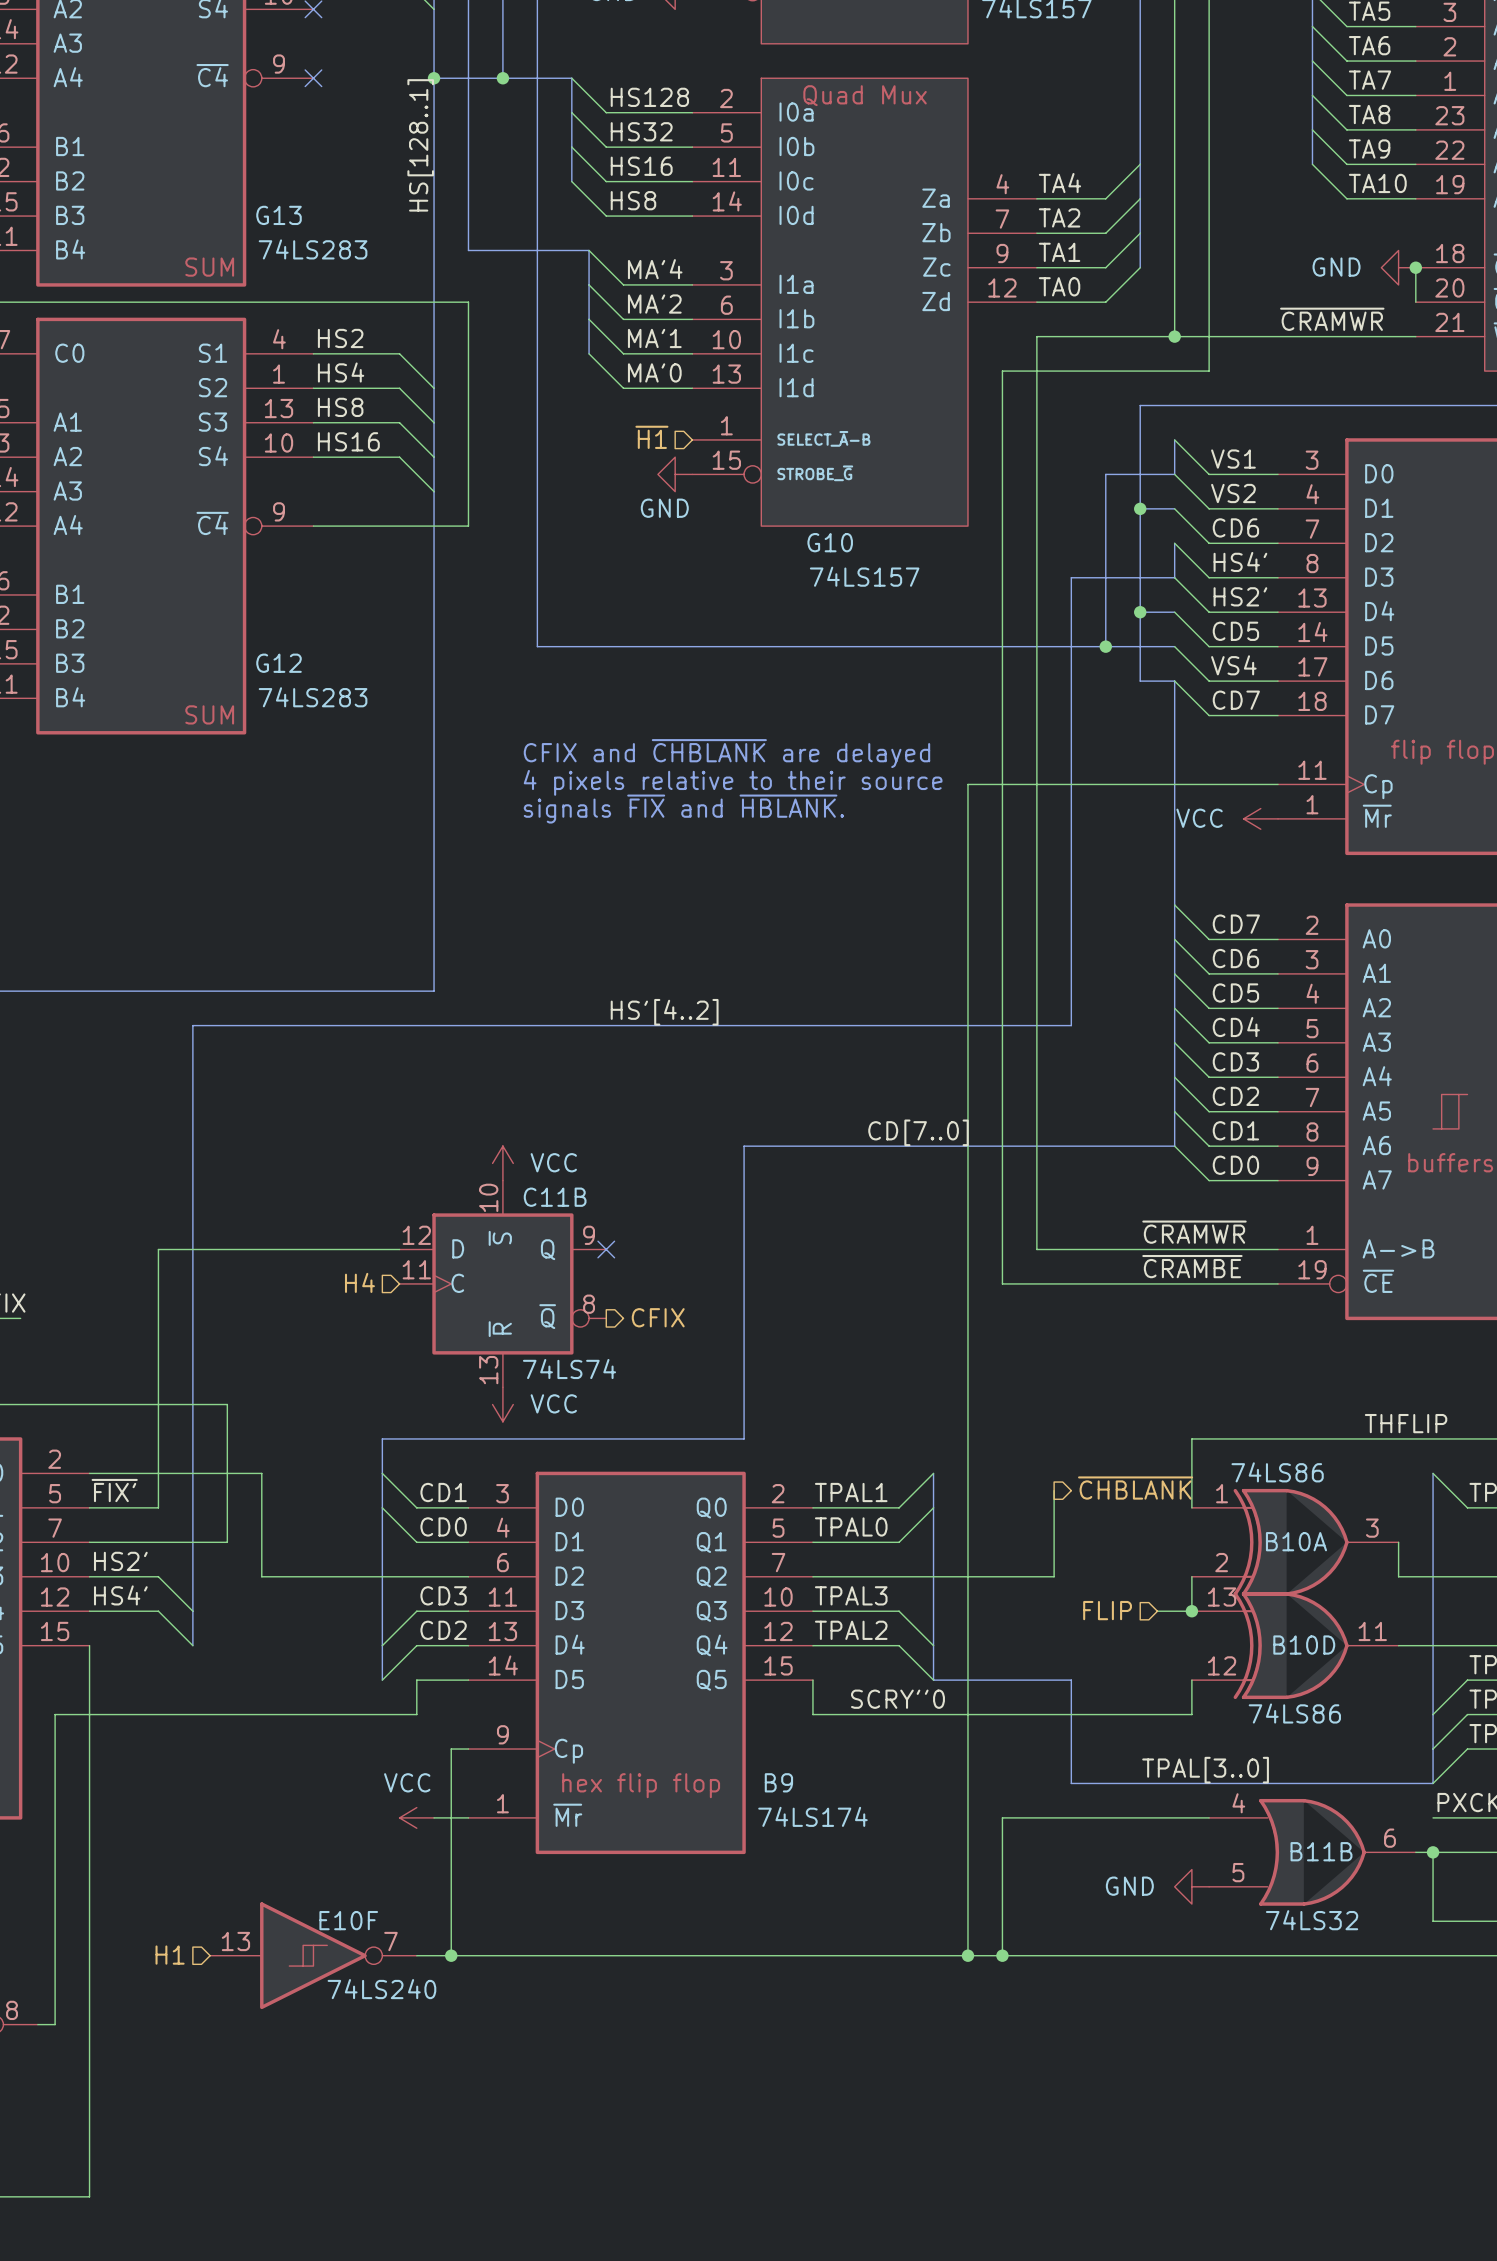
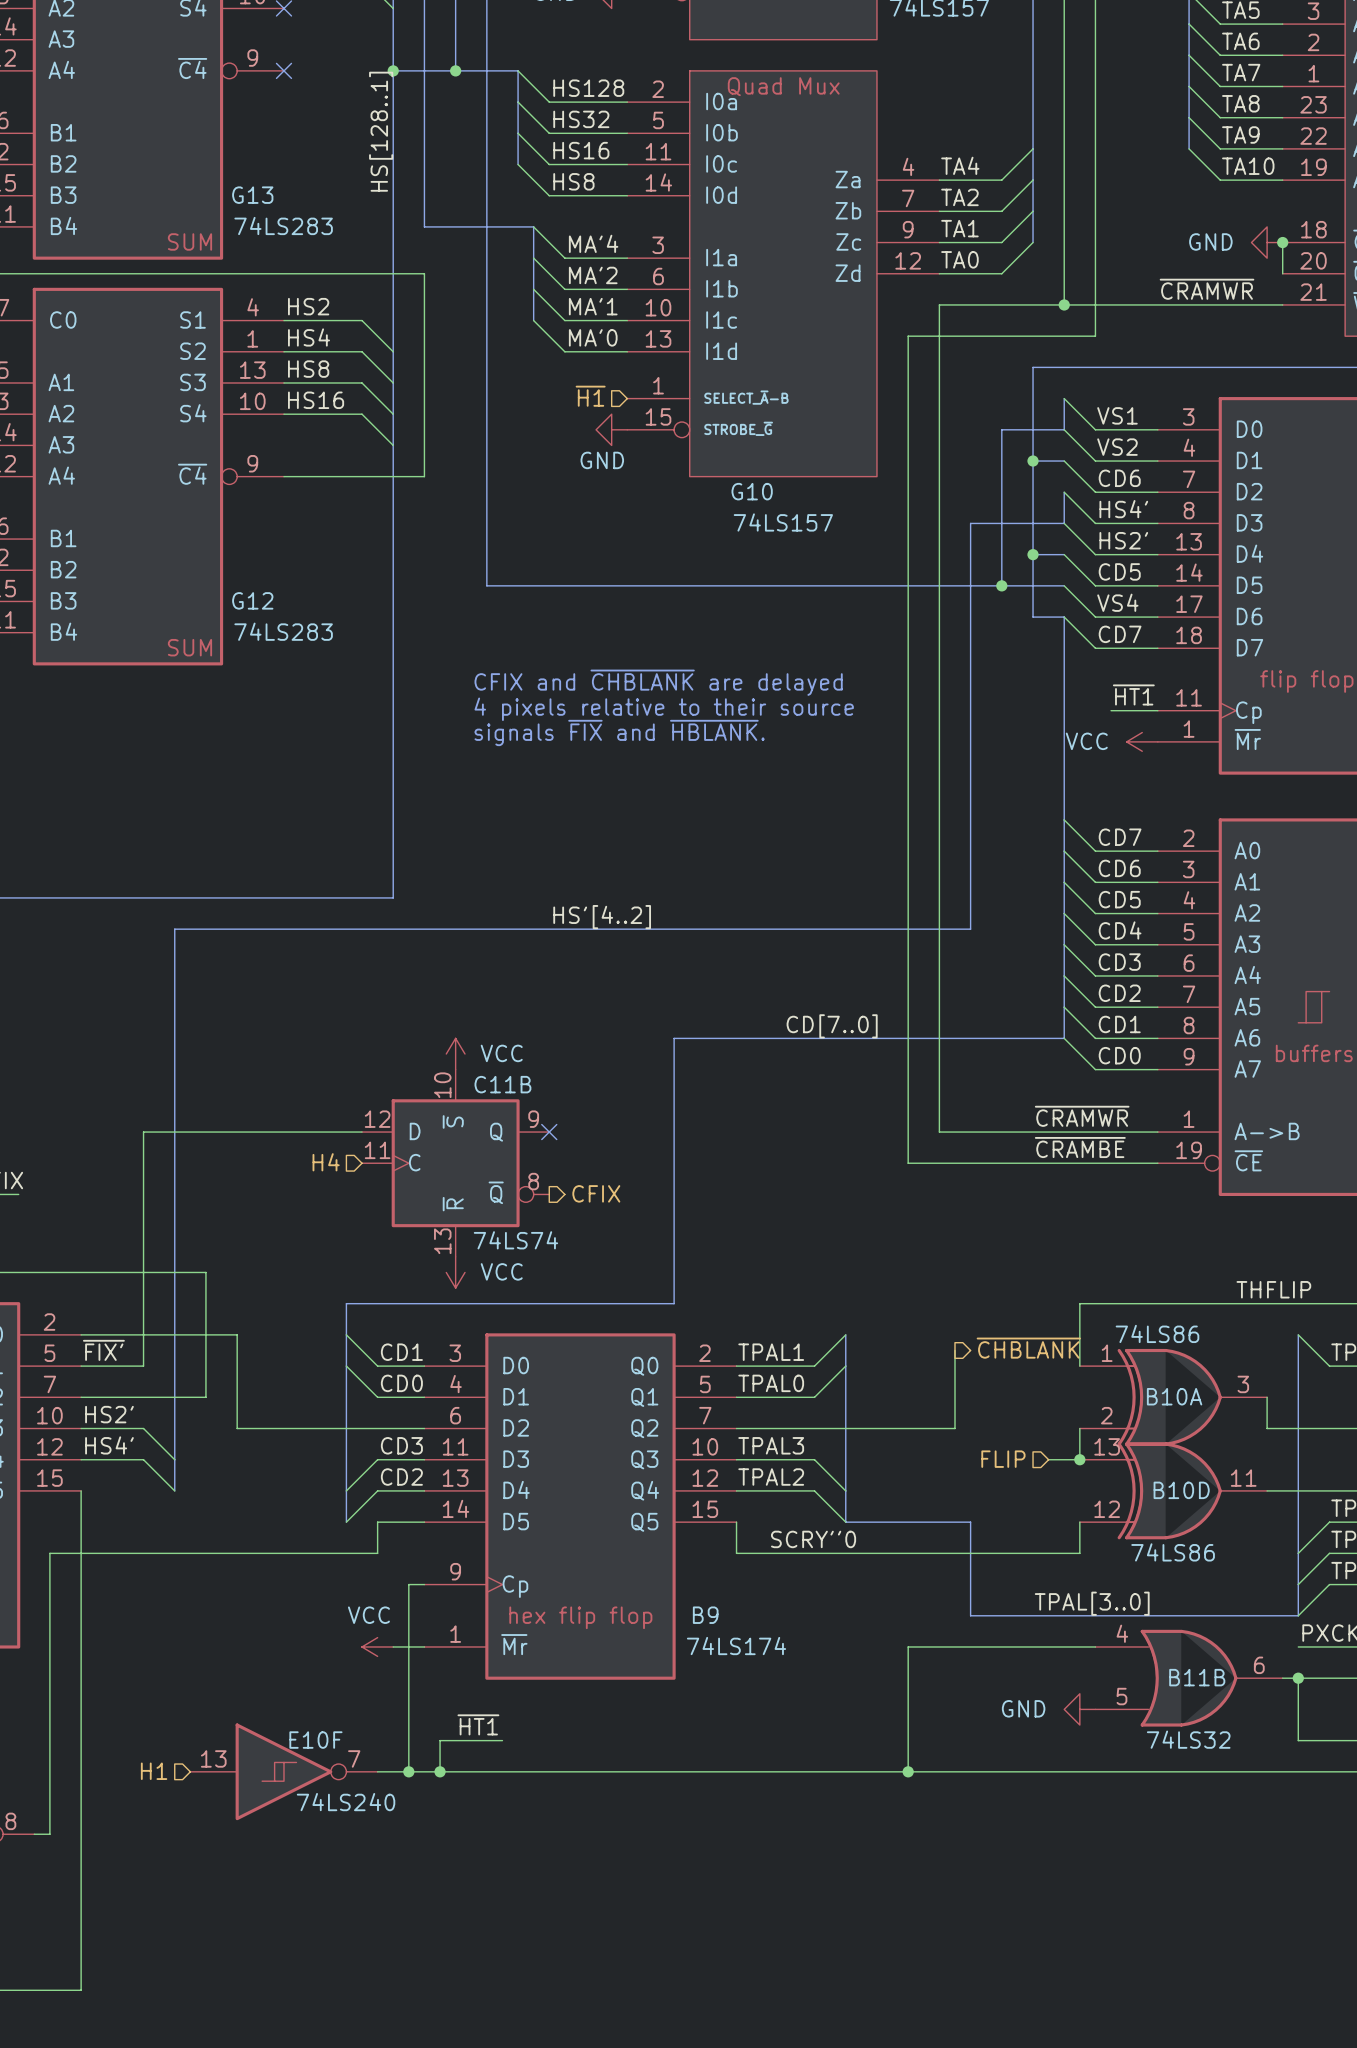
label: none -> ~{HT1} (1133, 694)
wire: (1226, 784) (967, 784) (967, 1955) -> none
label: none -> ~{HT1} (478, 1724)
wire: none -> (502, 1740) (440, 1740) (440, 1771)
junction: none -> (440, 1771)
junction: (967, 1955) -> none

